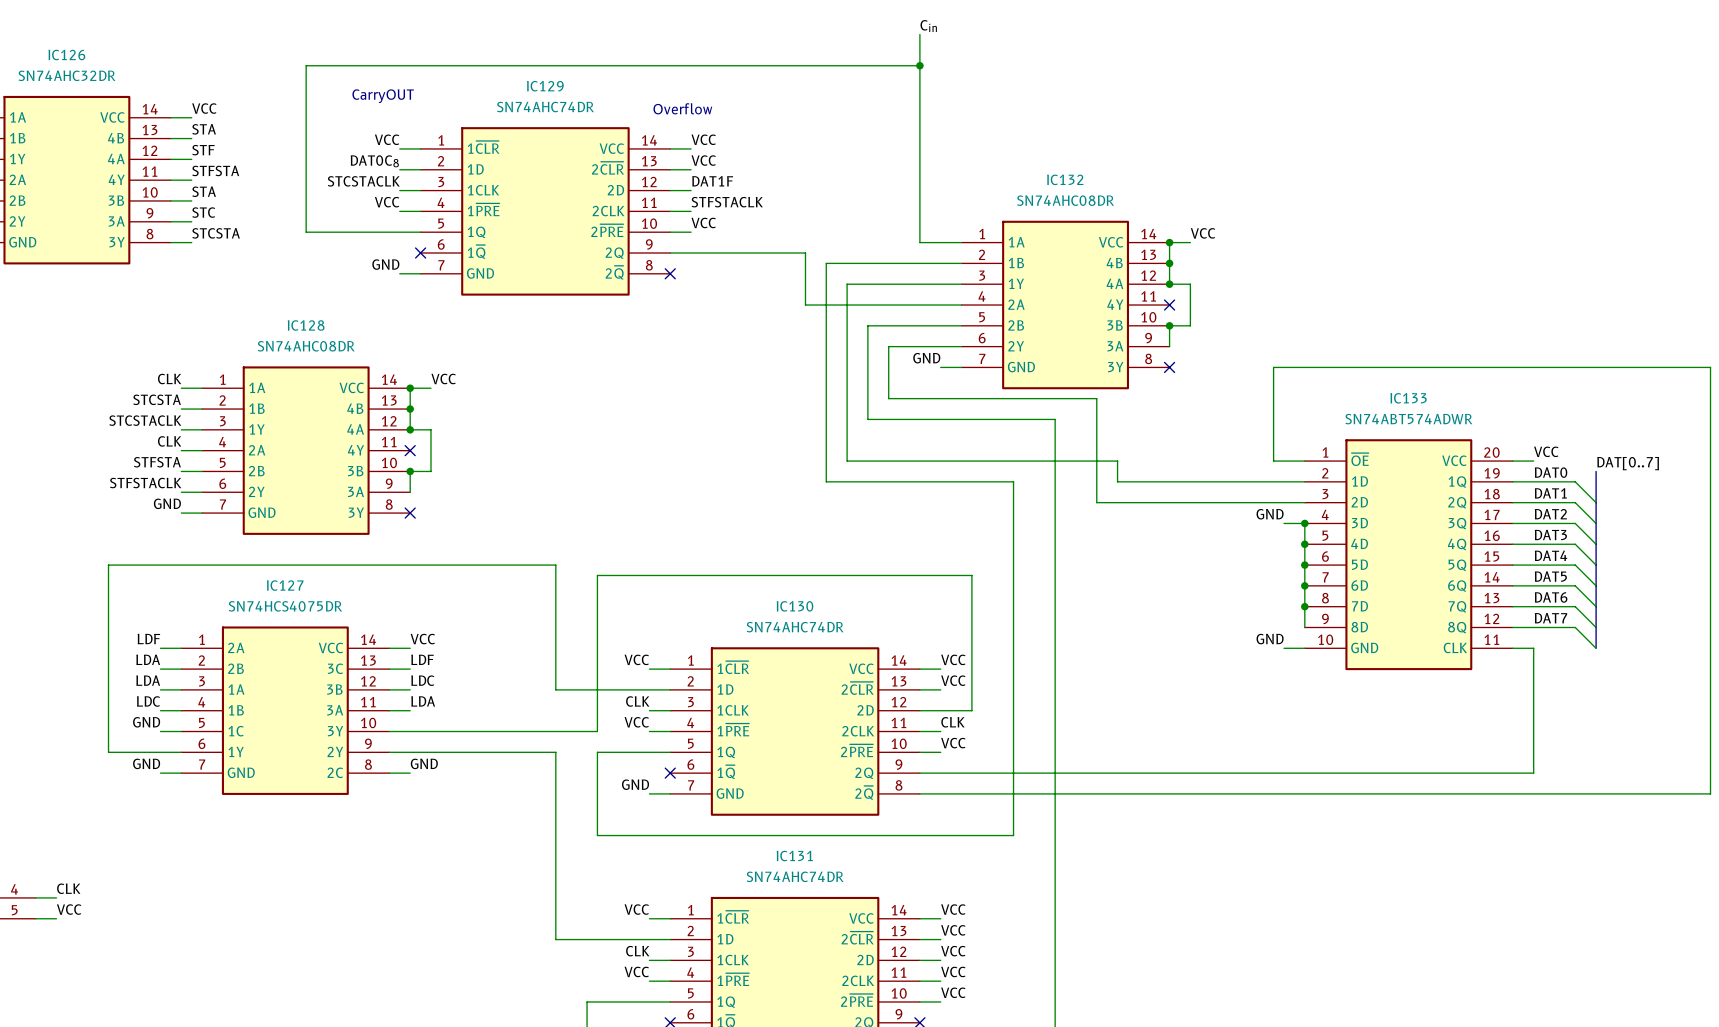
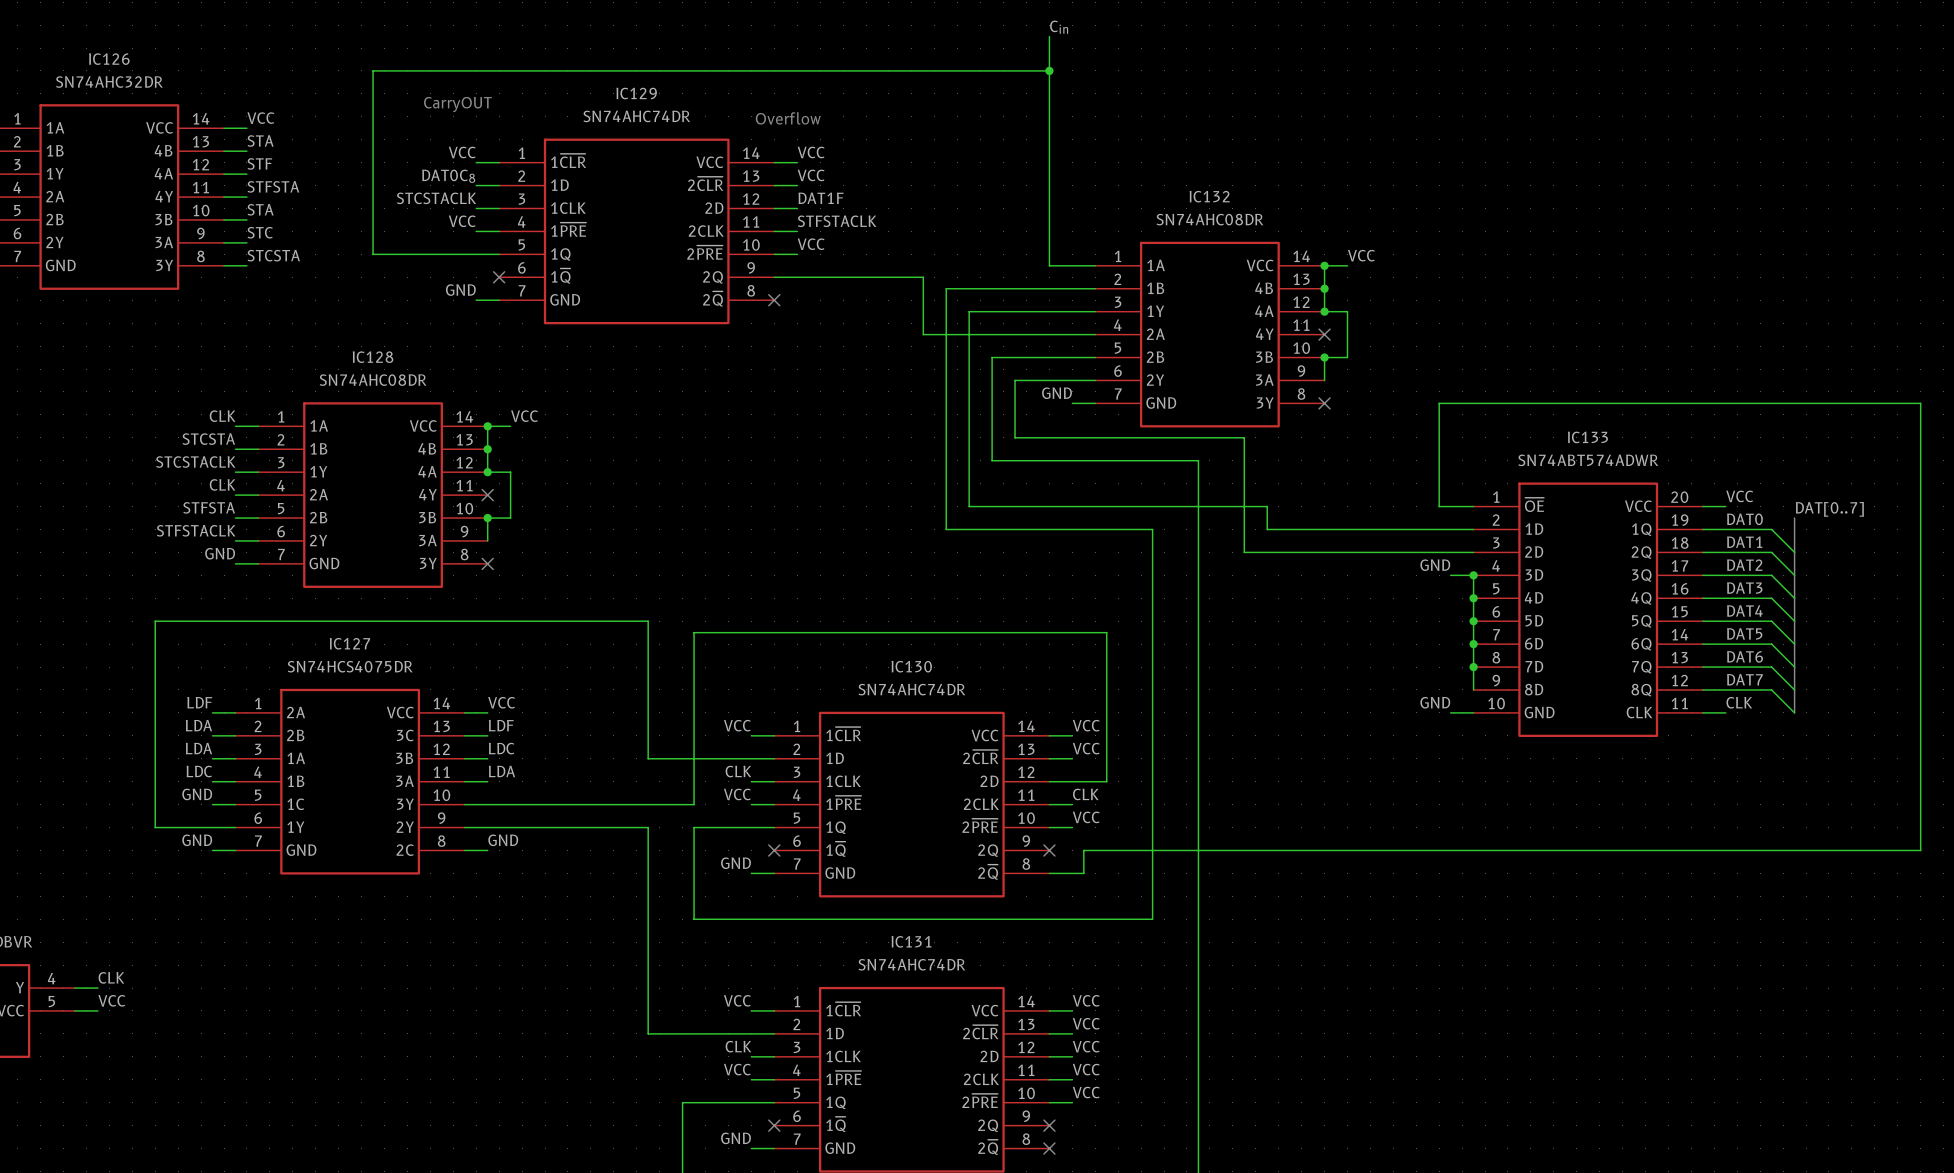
label: none -> CLK (1739, 702)
wire: (1533, 648) (1533, 773) -> (1920, 850) (1725, 850)
wire: (919, 773) (951, 773) -> (1083, 873) (1083, 850)
no-connect mark: none -> (1049, 850)
wire: (1710, 773) (1710, 793) (951, 793) -> none

